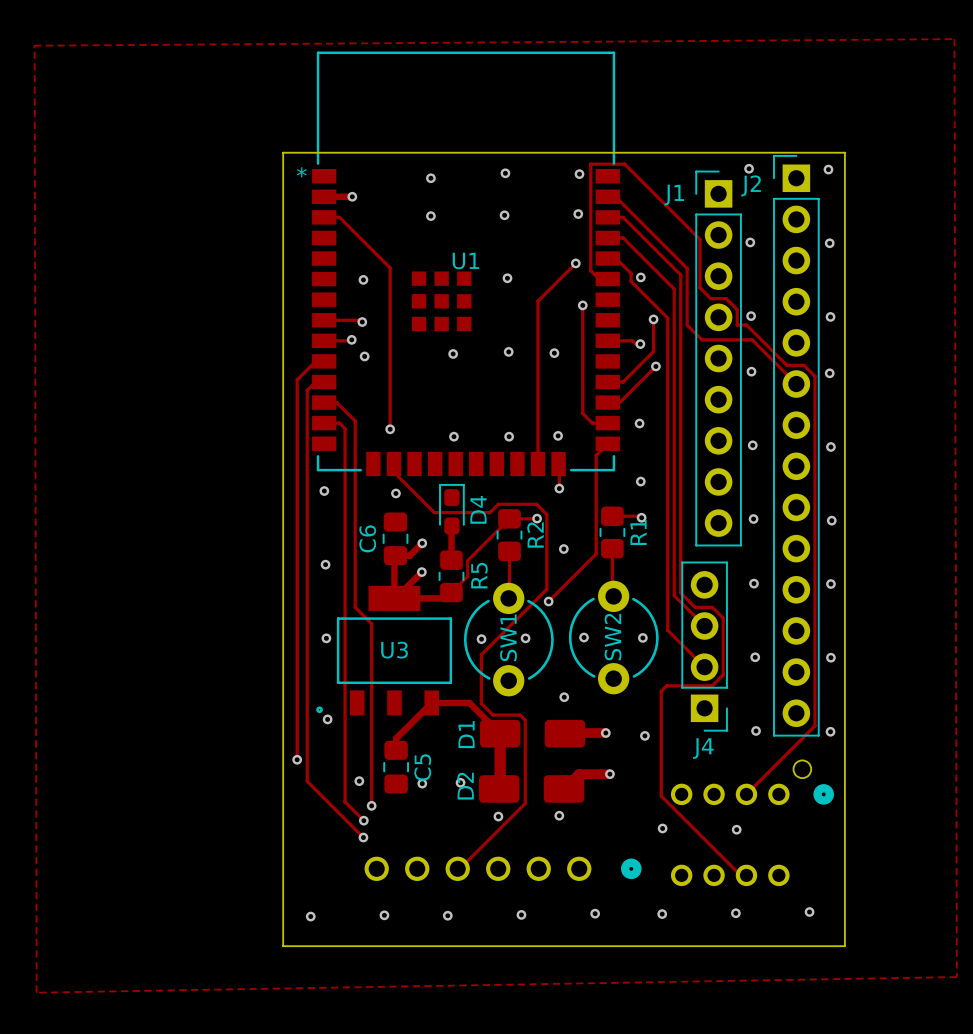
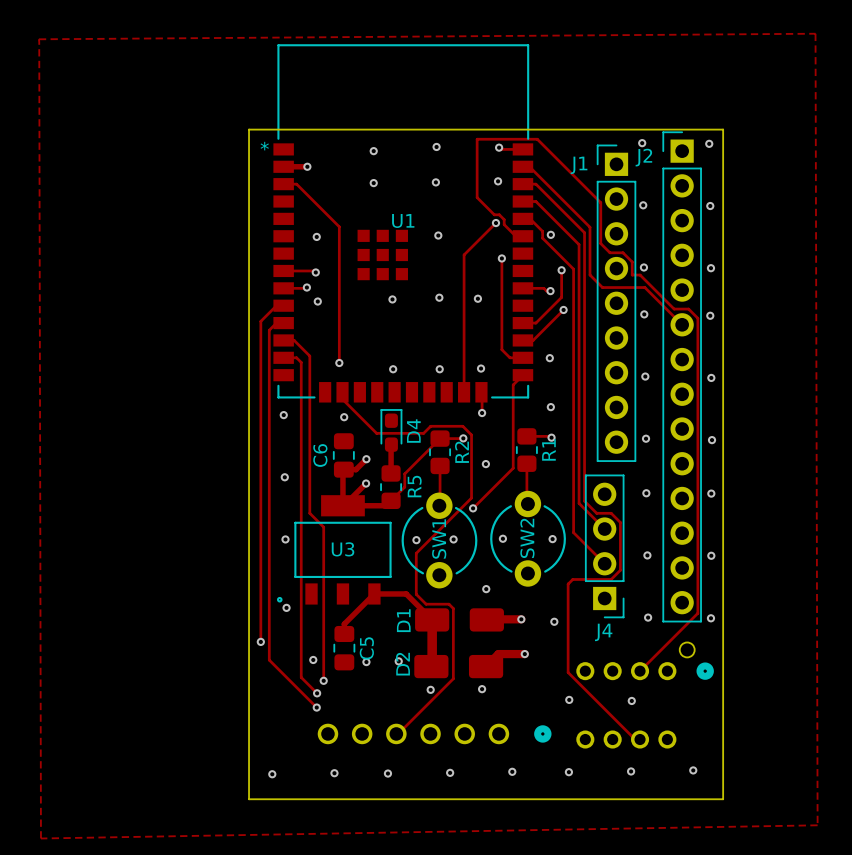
track: (590, 164) (590, 270) -> (508, 139) (477, 139) (477, 197) (494, 214) (499, 214) (508, 229)
track: none -> (499, 147) (500, 149) (522, 149)

